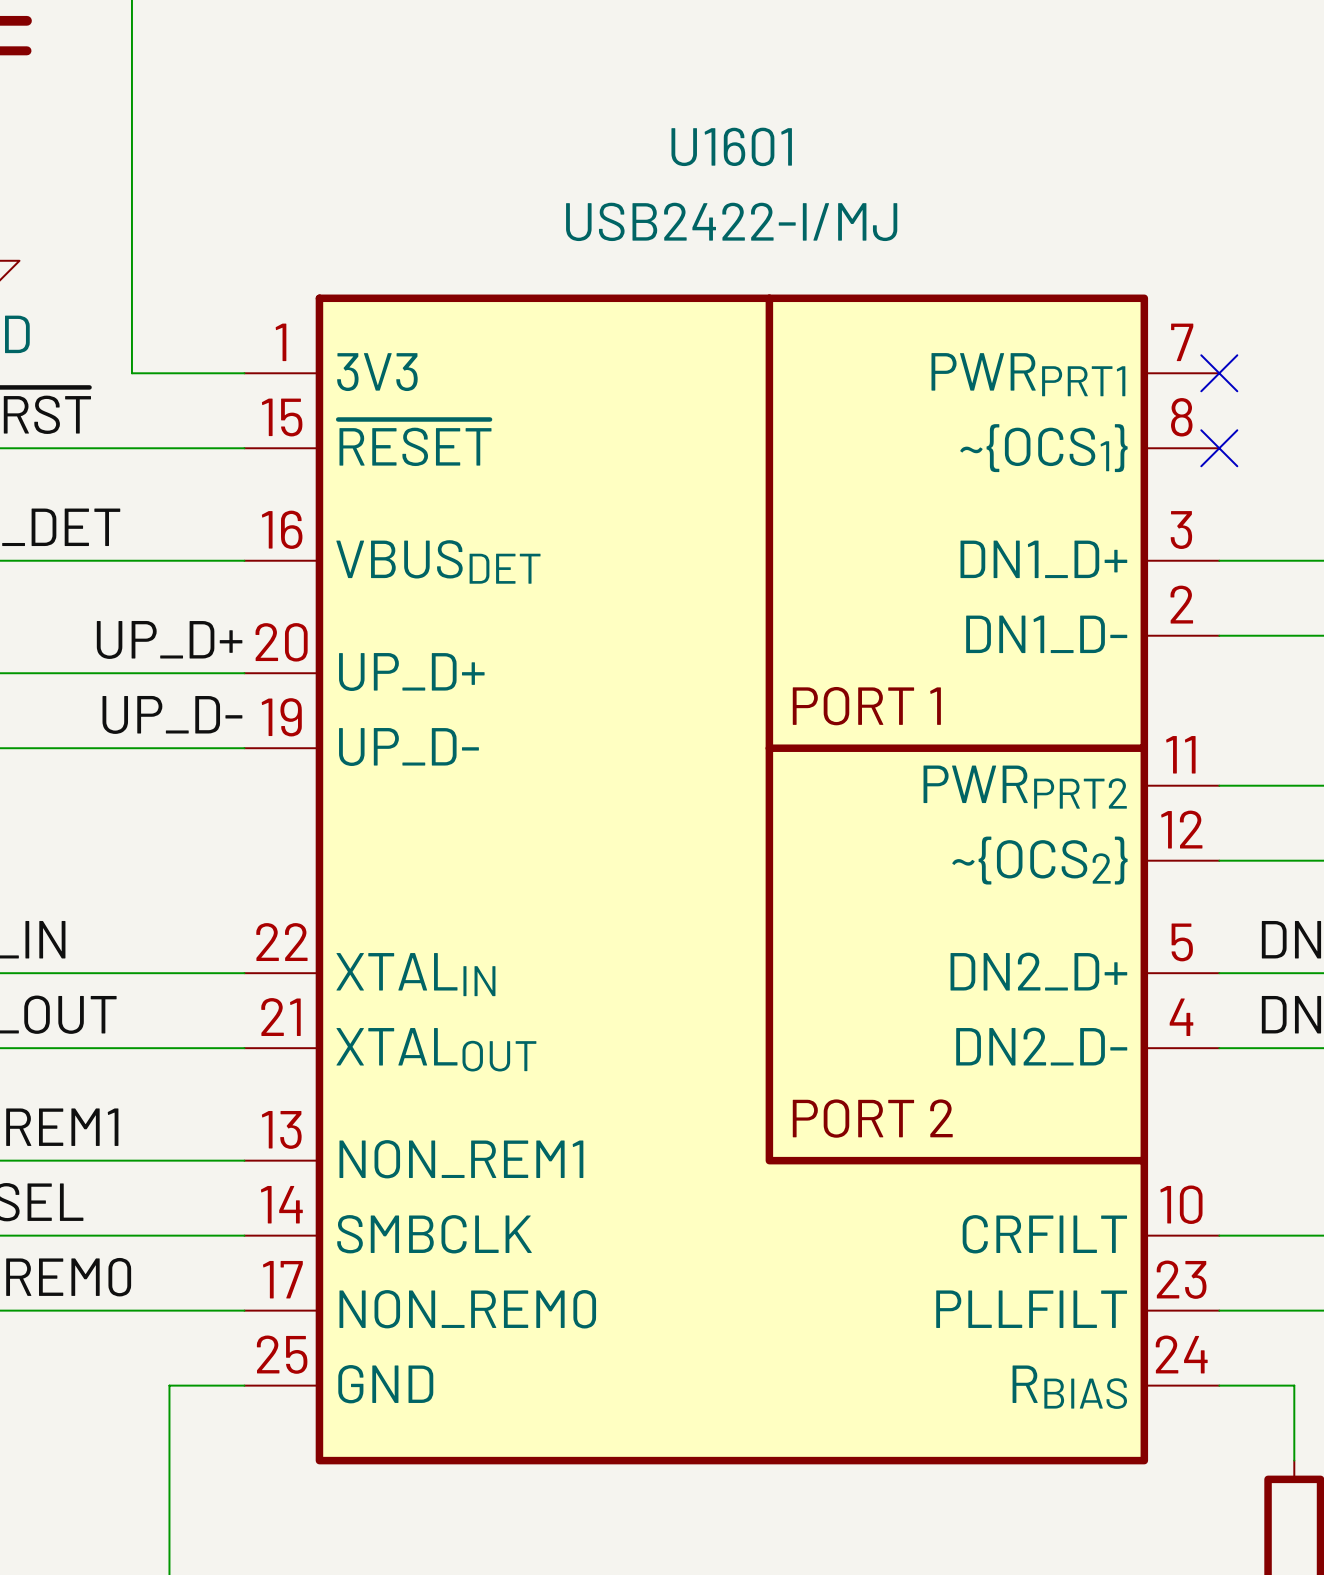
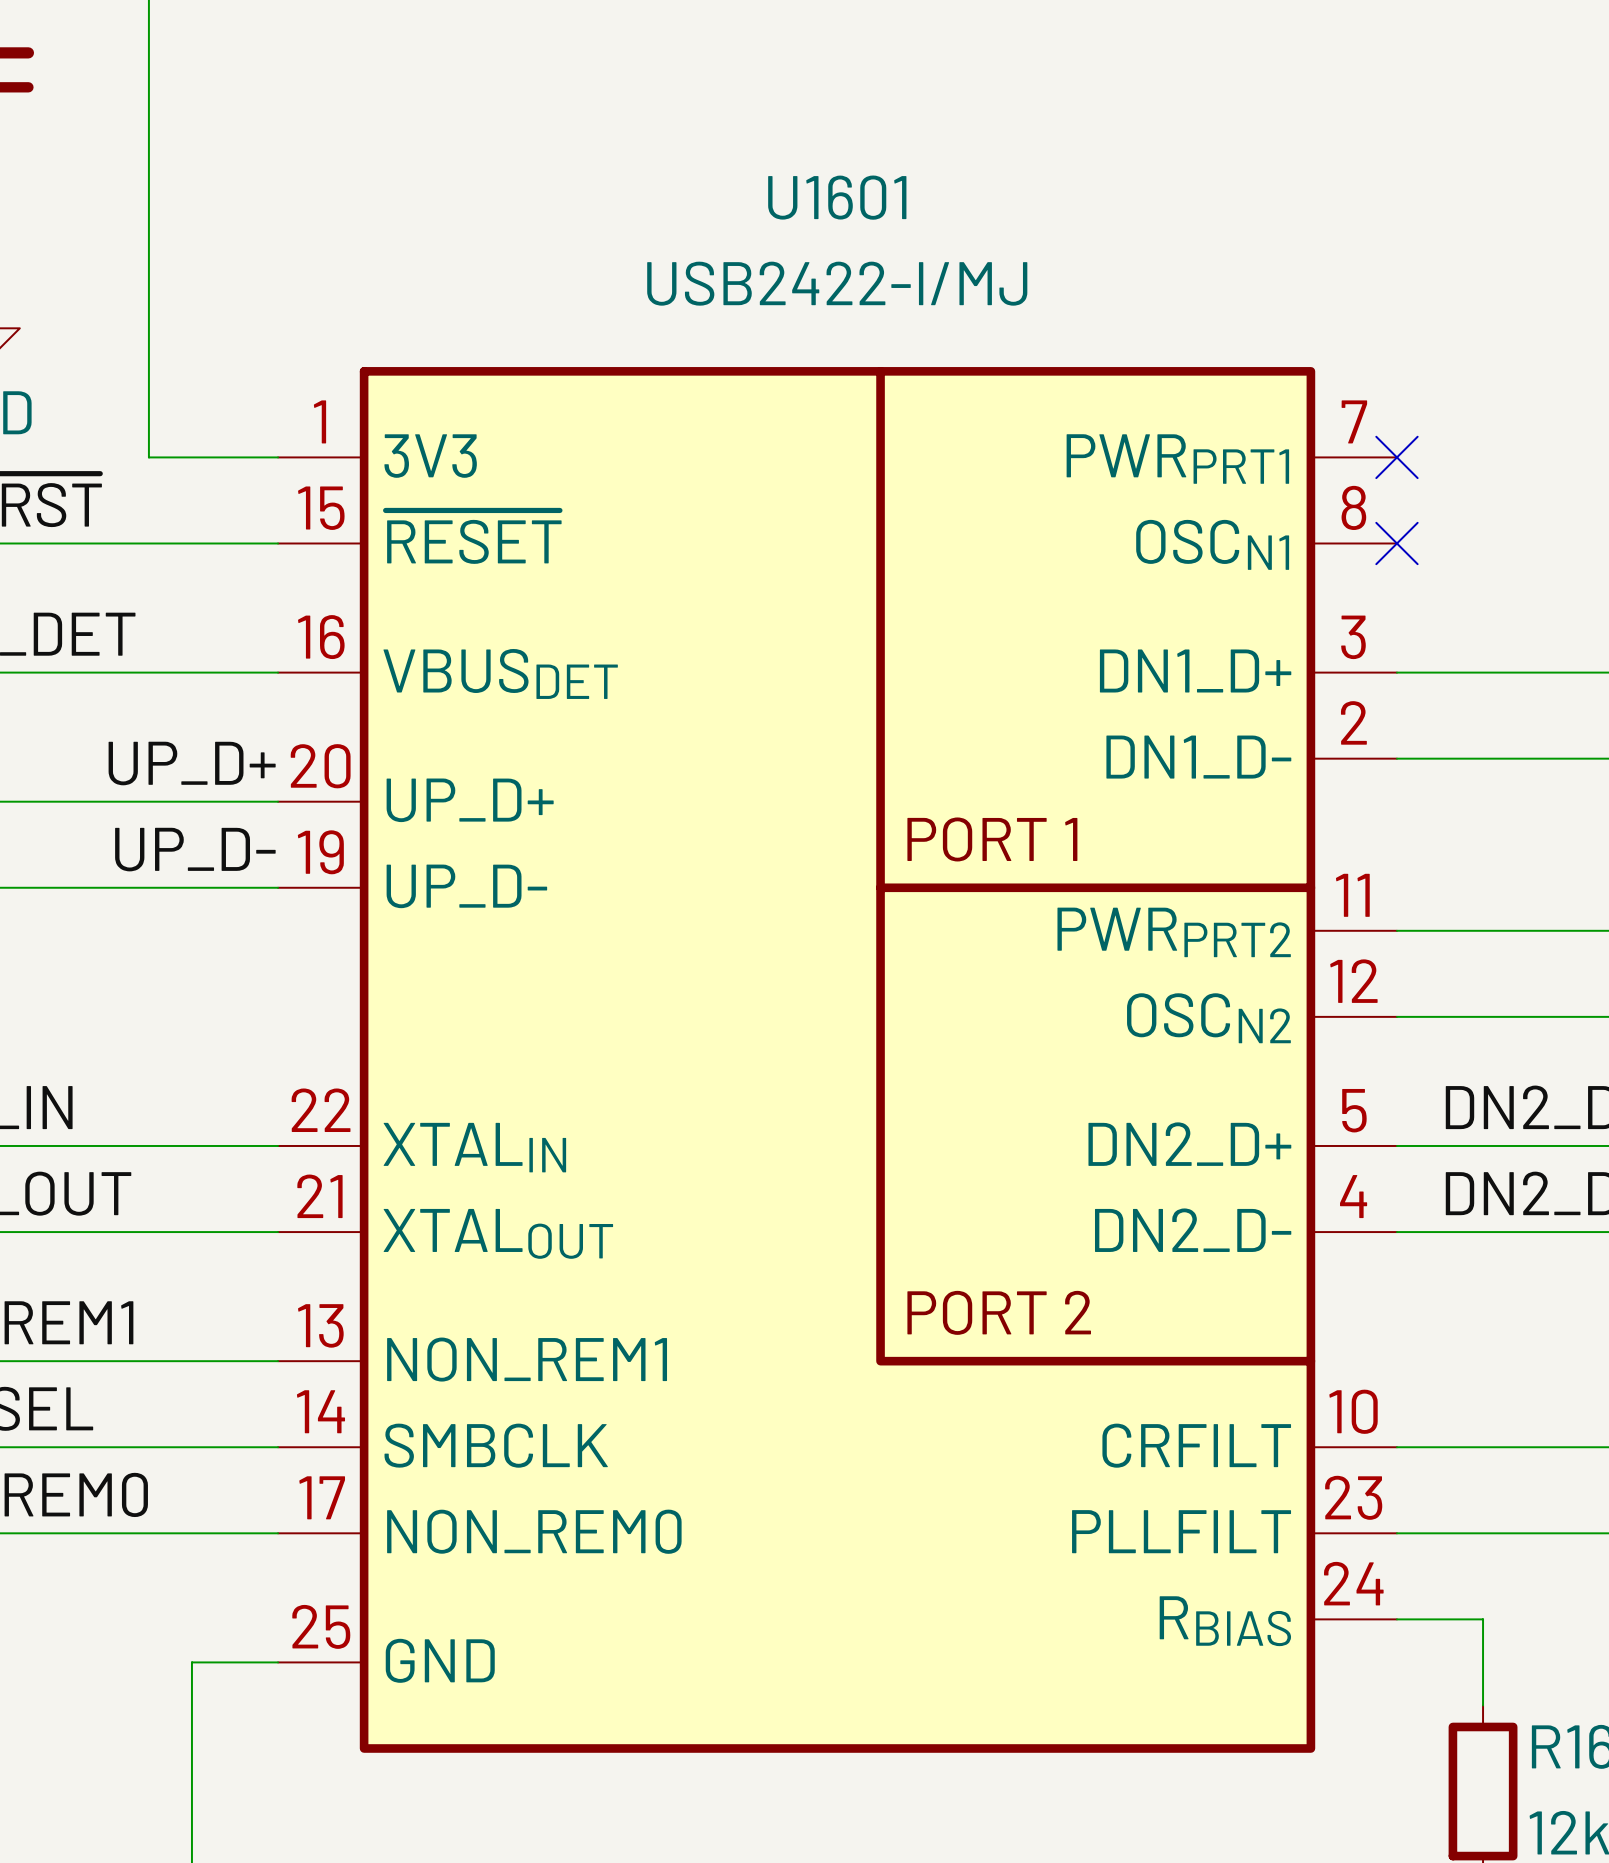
U1601 symbol: [244, 294, 1220, 1465] -> [278, 367, 1397, 1753]
wire: (244, 1385) (169, 1385) (169, 1423) -> (278, 1662) (191, 1662)

